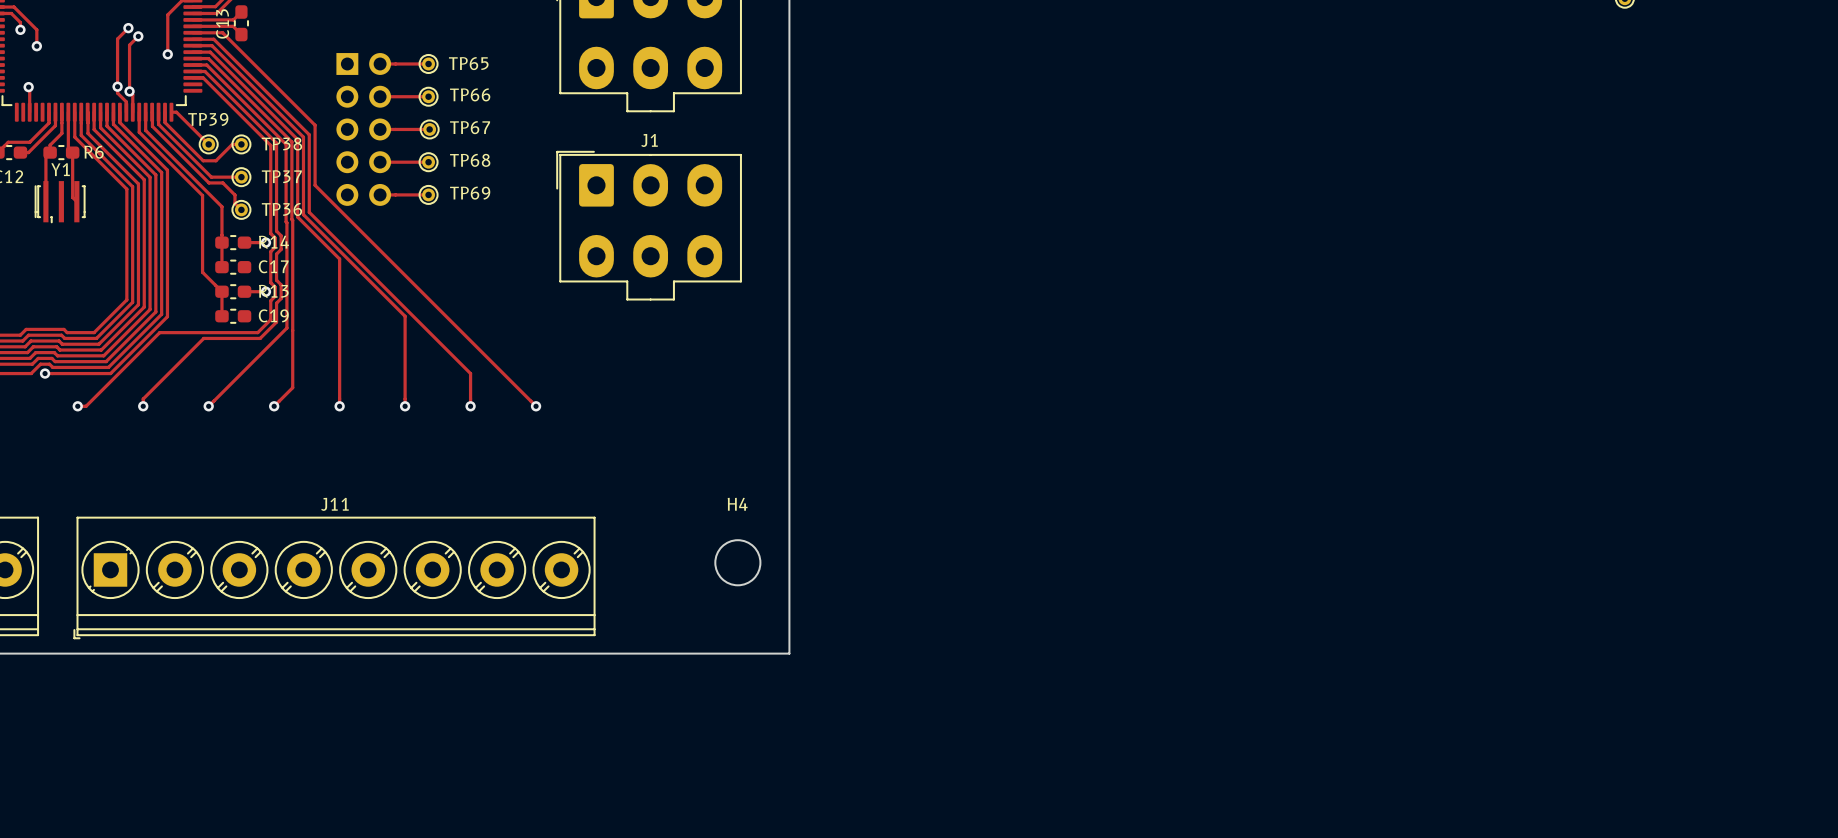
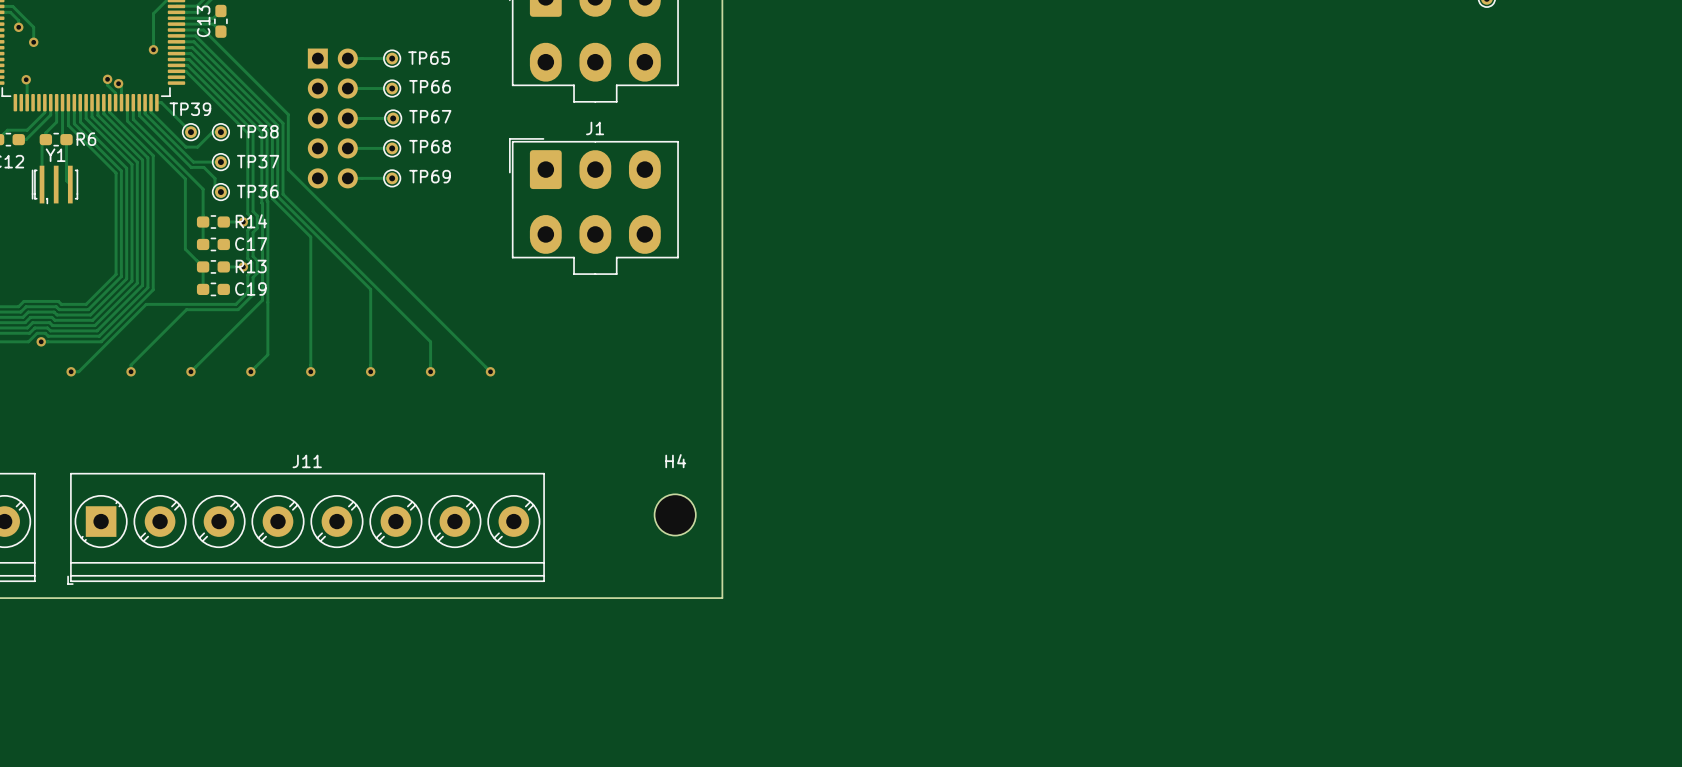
track: (128, 28) (117, 38) (117, 86) -> none
via: (128, 28) -> none
track: (138, 36) (129, 45) (129, 91) -> none
via: (138, 36) -> none

